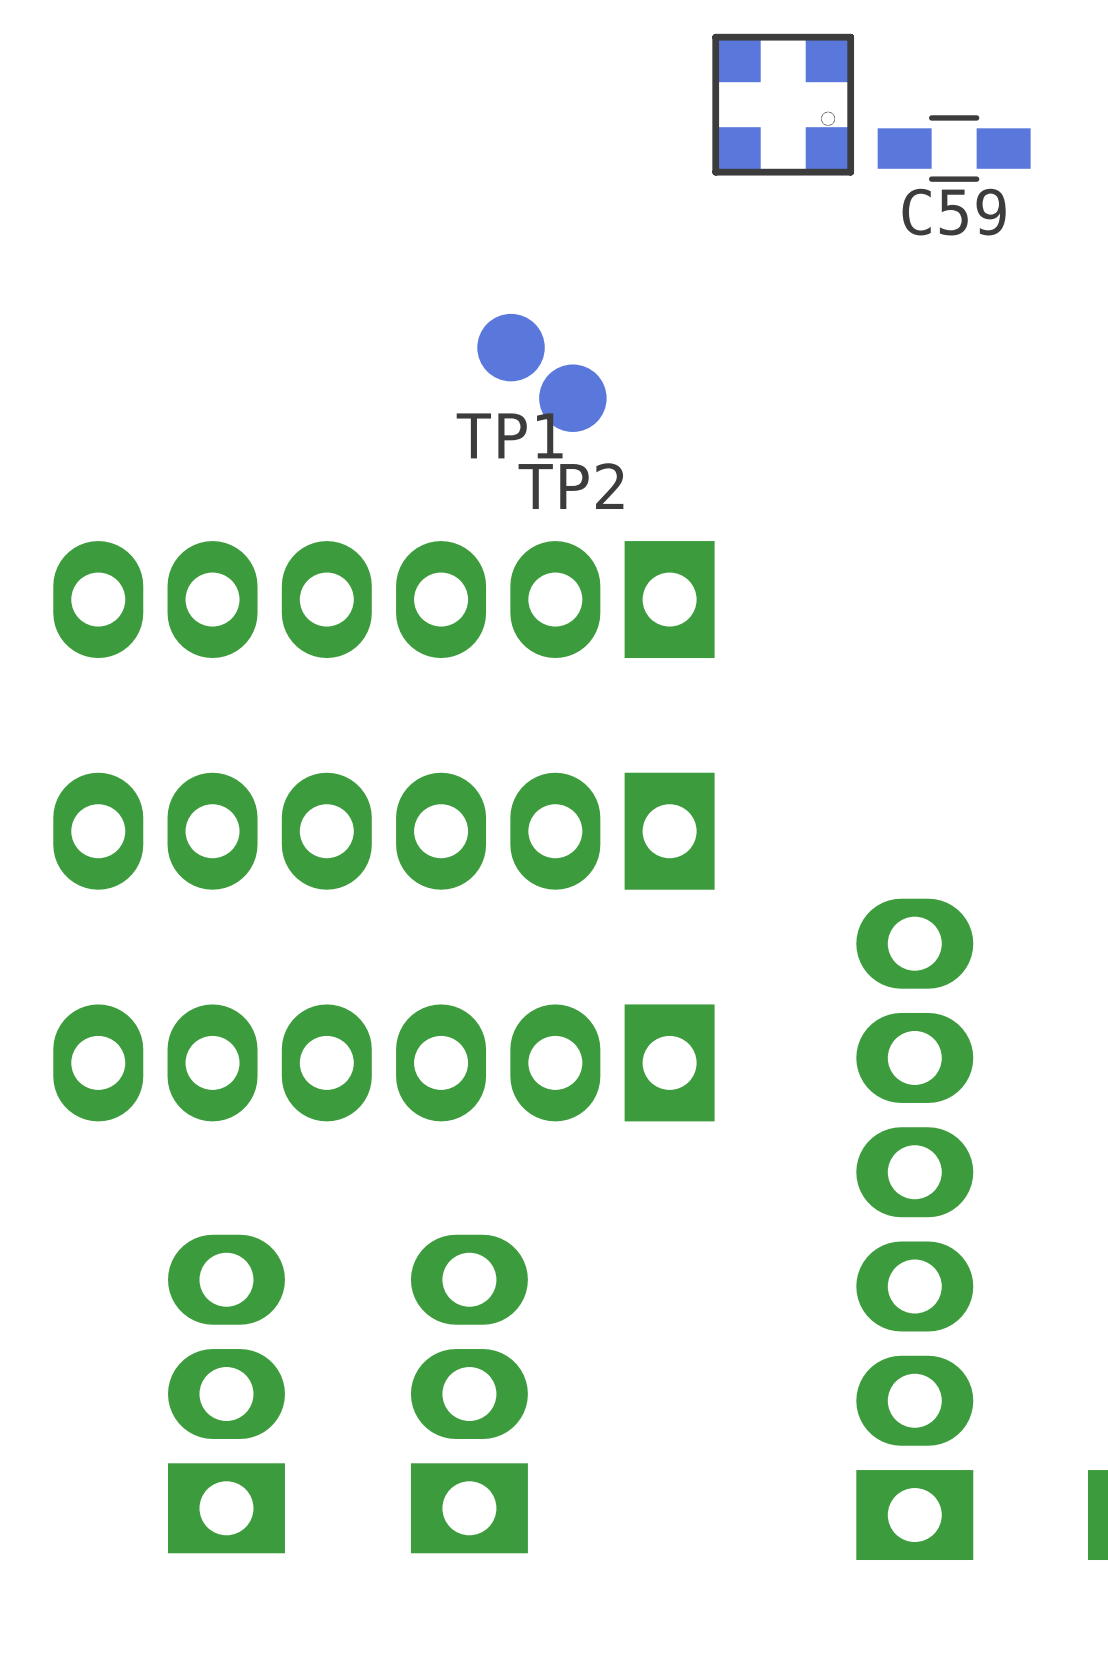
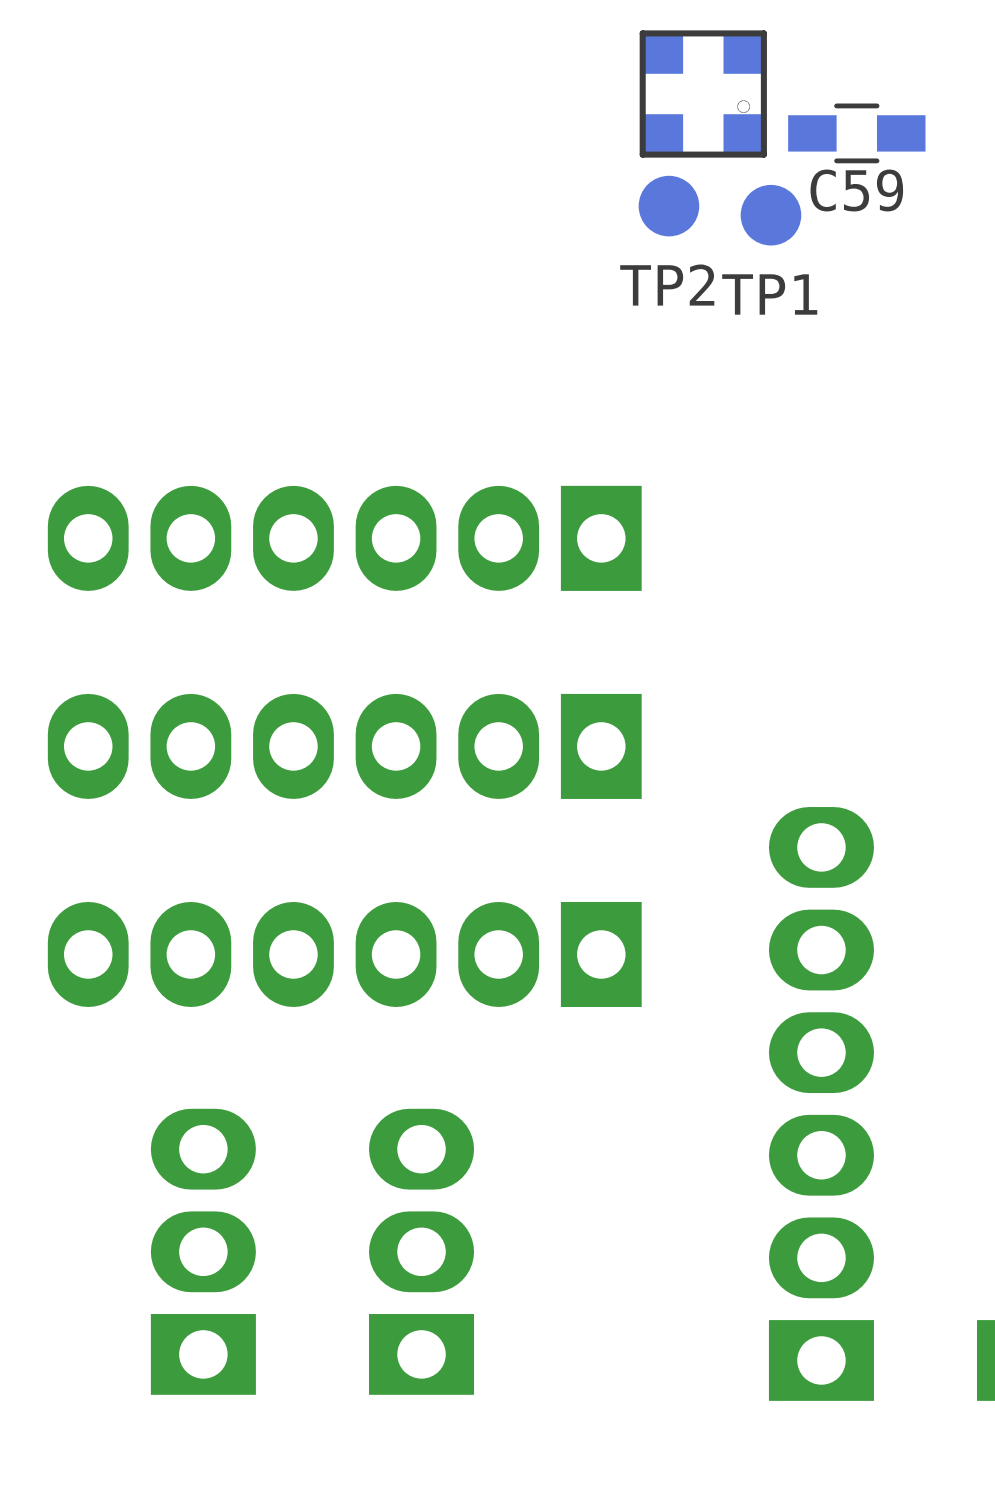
TP1 position: (511, 347) -> (770, 215)
TP2 position: (572, 398) -> (668, 206)

